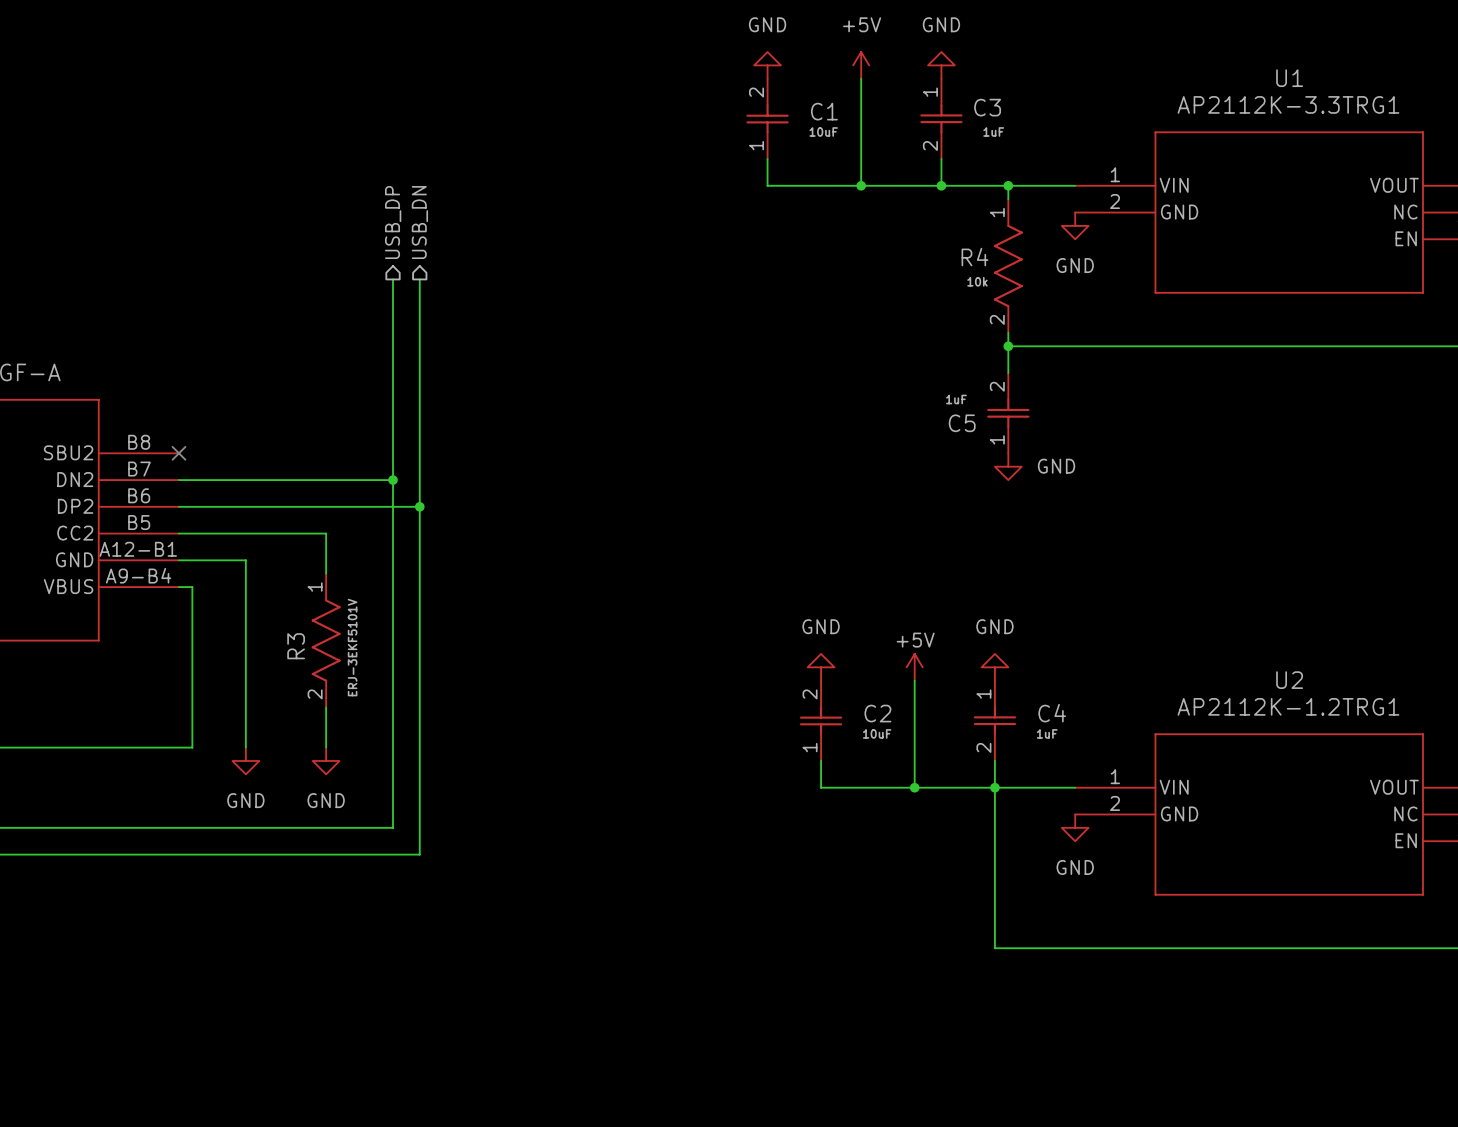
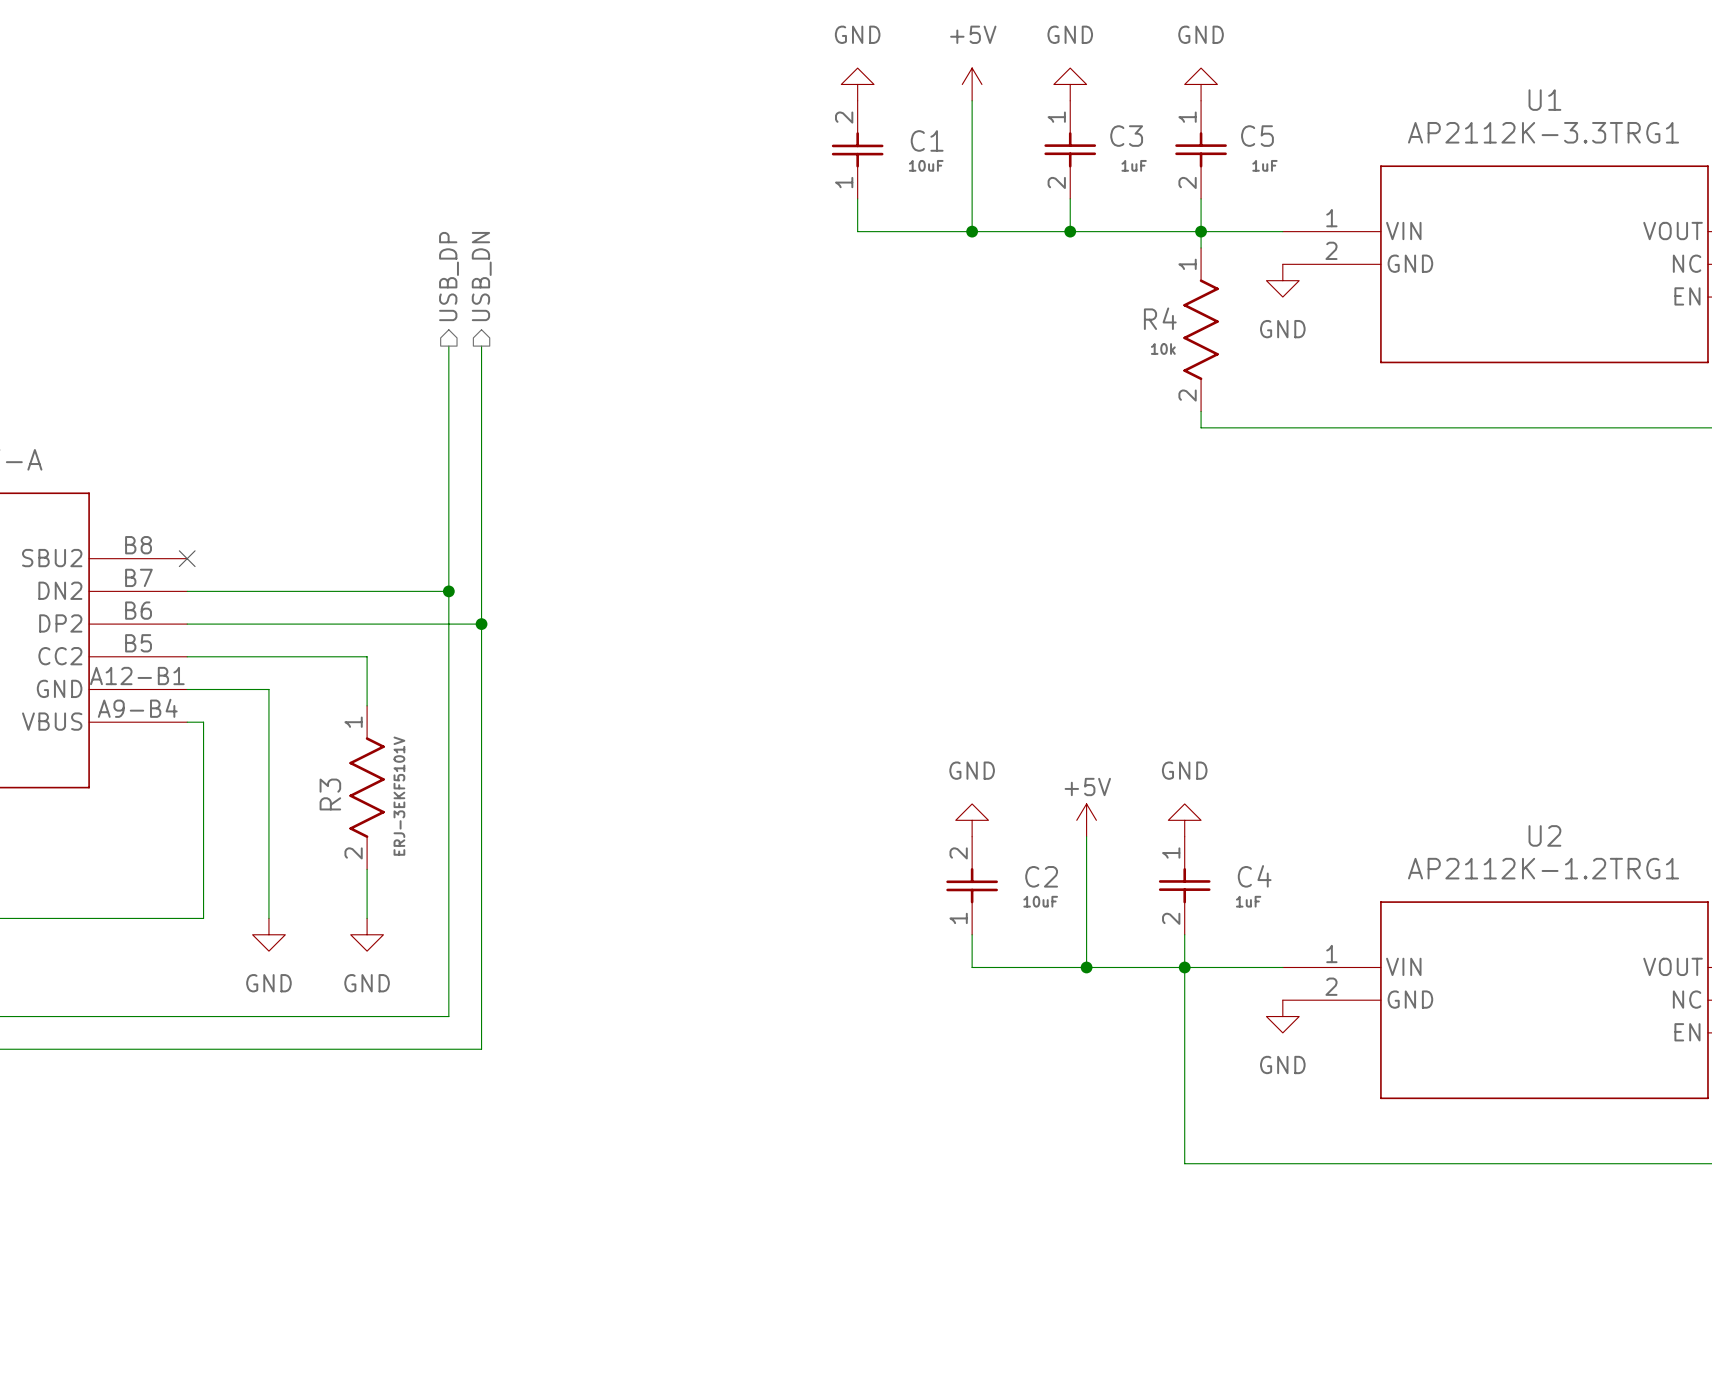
power symbol position: GND (767, 65) -> GND (857, 84)
power symbol position: +5V (861, 65) -> +5V (972, 84)
power symbol: none -> GND (1070, 84)
power symbol: GND (941, 65) -> none
power symbol: none -> GND (1201, 84)
wire: (861, 78) (861, 185) -> (972, 100) (972, 231)
C1 position: (767, 118) -> (857, 149)
C3 position: (941, 118) -> (1070, 149)
wire: (767, 159) (767, 185) -> (857, 198) (857, 231) (906, 231)
wire: (941, 159) (941, 185) -> (1070, 198) (1070, 231)
junction: none -> (972, 231)
junction: (861, 185) -> none
junction: none -> (1070, 231)
junction: (941, 185) -> none
wire: (1008, 346) (1008, 373) -> (1201, 198) (1201, 231)
junction: (1008, 346) -> none
C5 rotation: 0° (1008, 413) -> 180° (1201, 149)
C5 position: (1008, 413) -> (1201, 149)
power symbol: GND (1008, 466) -> none

